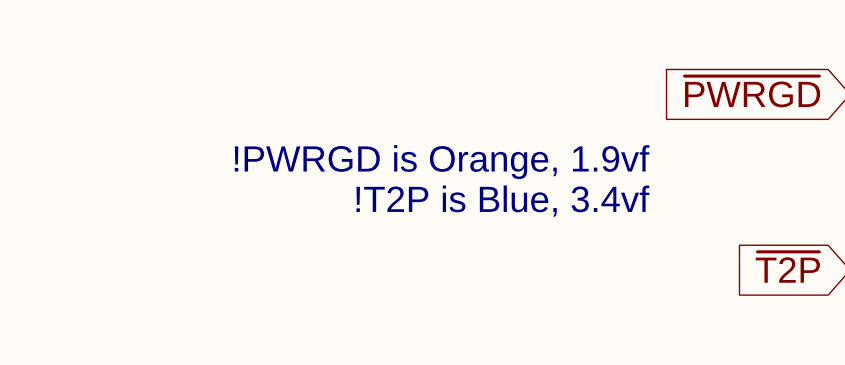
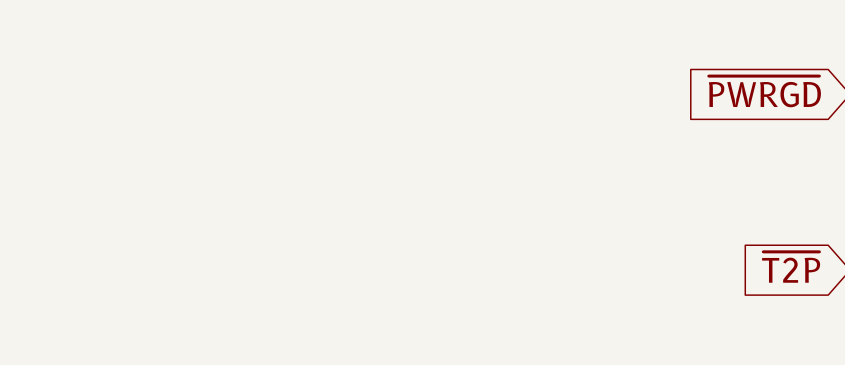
text: !PWRGD is Orange, 1.9vf (442, 162) -> none
text: !T2P is Blue, 3.4vf (502, 201) -> none

